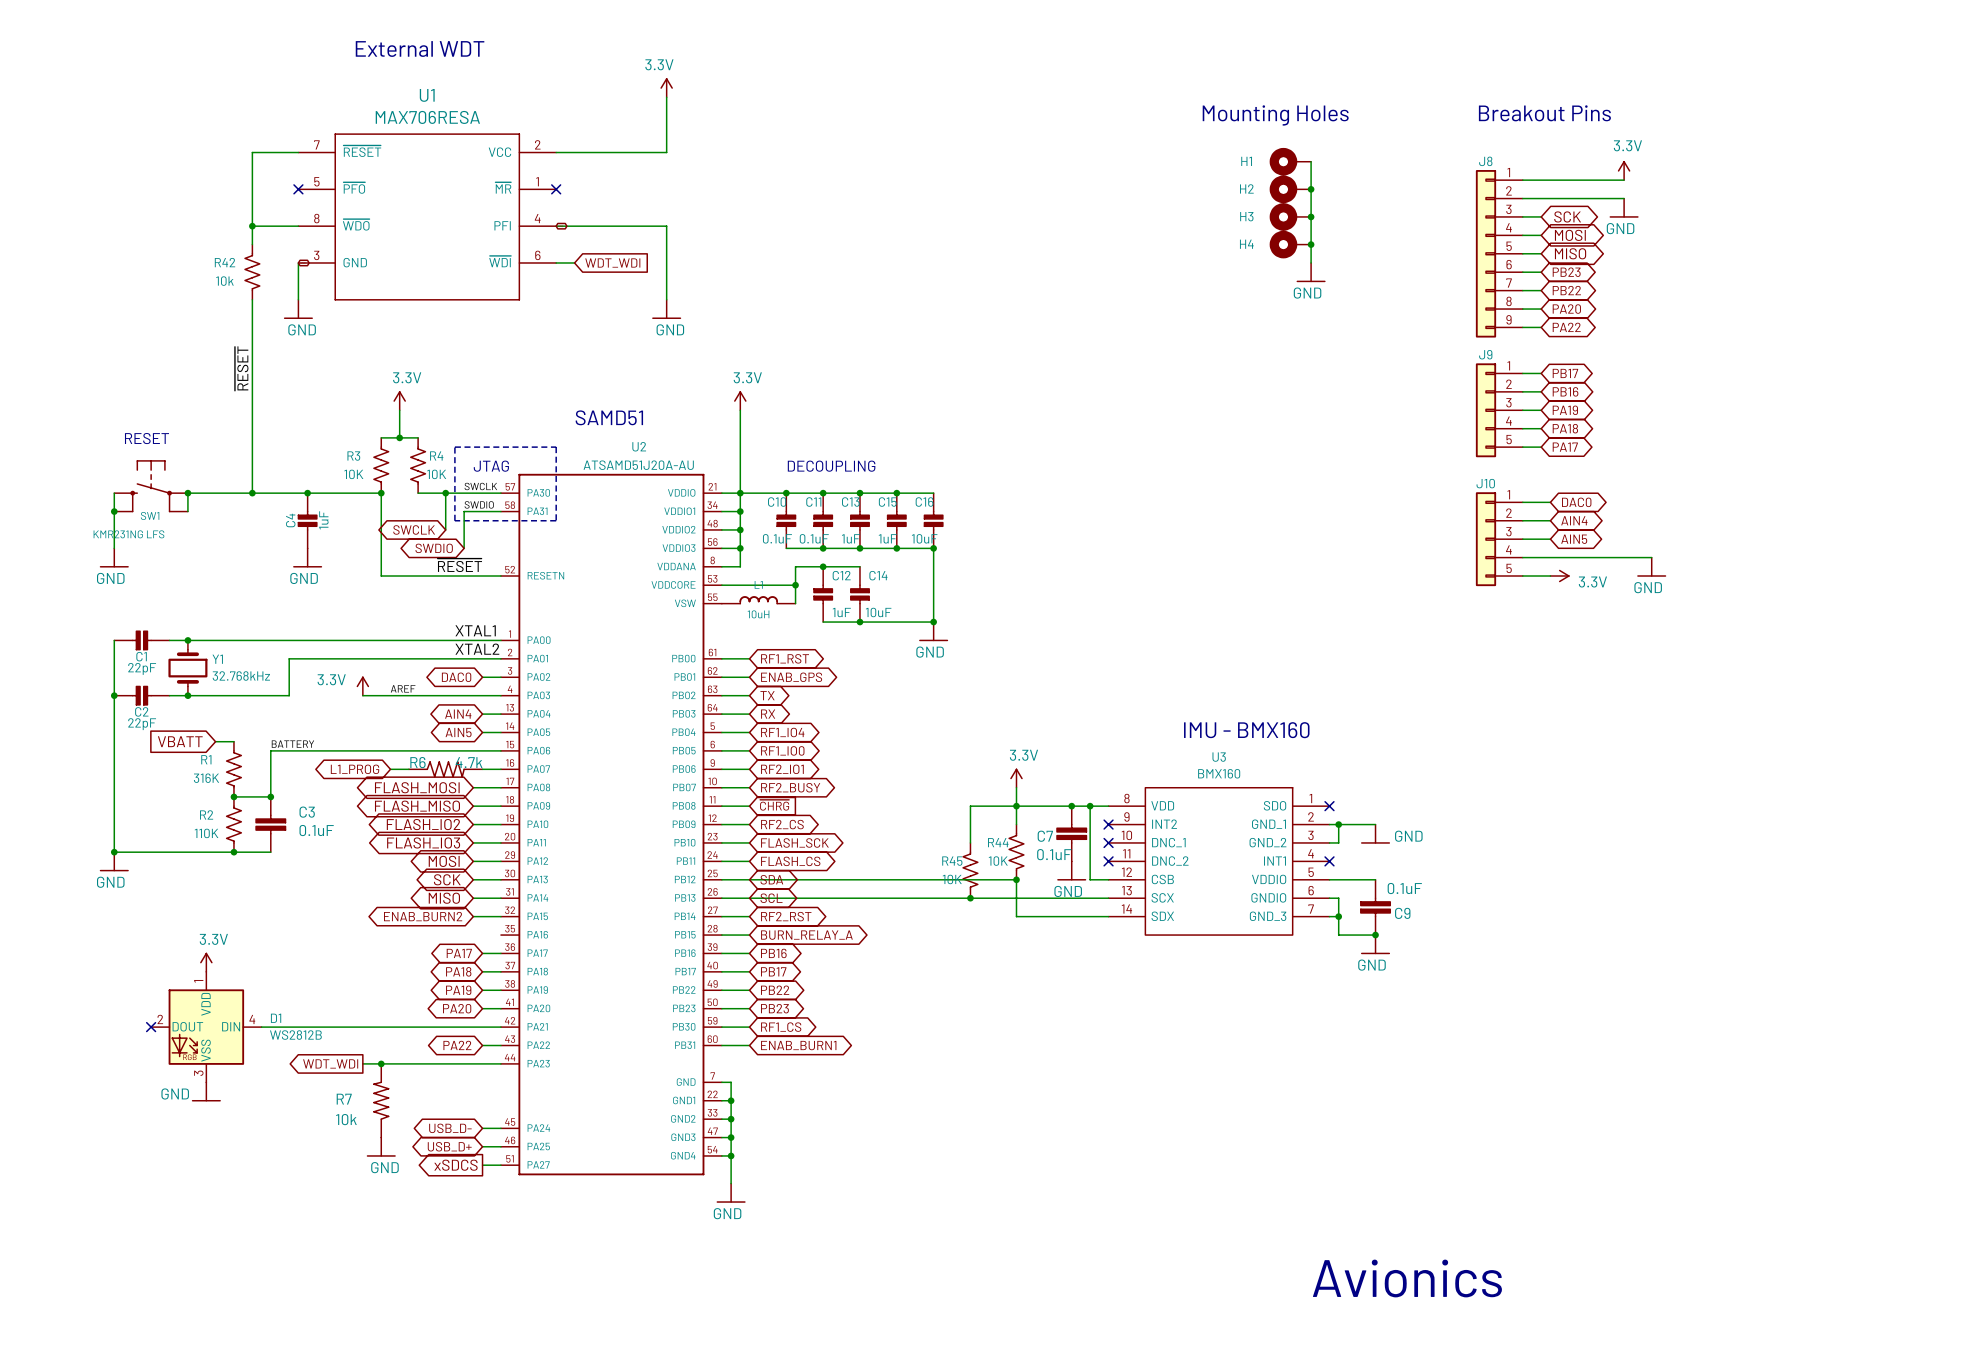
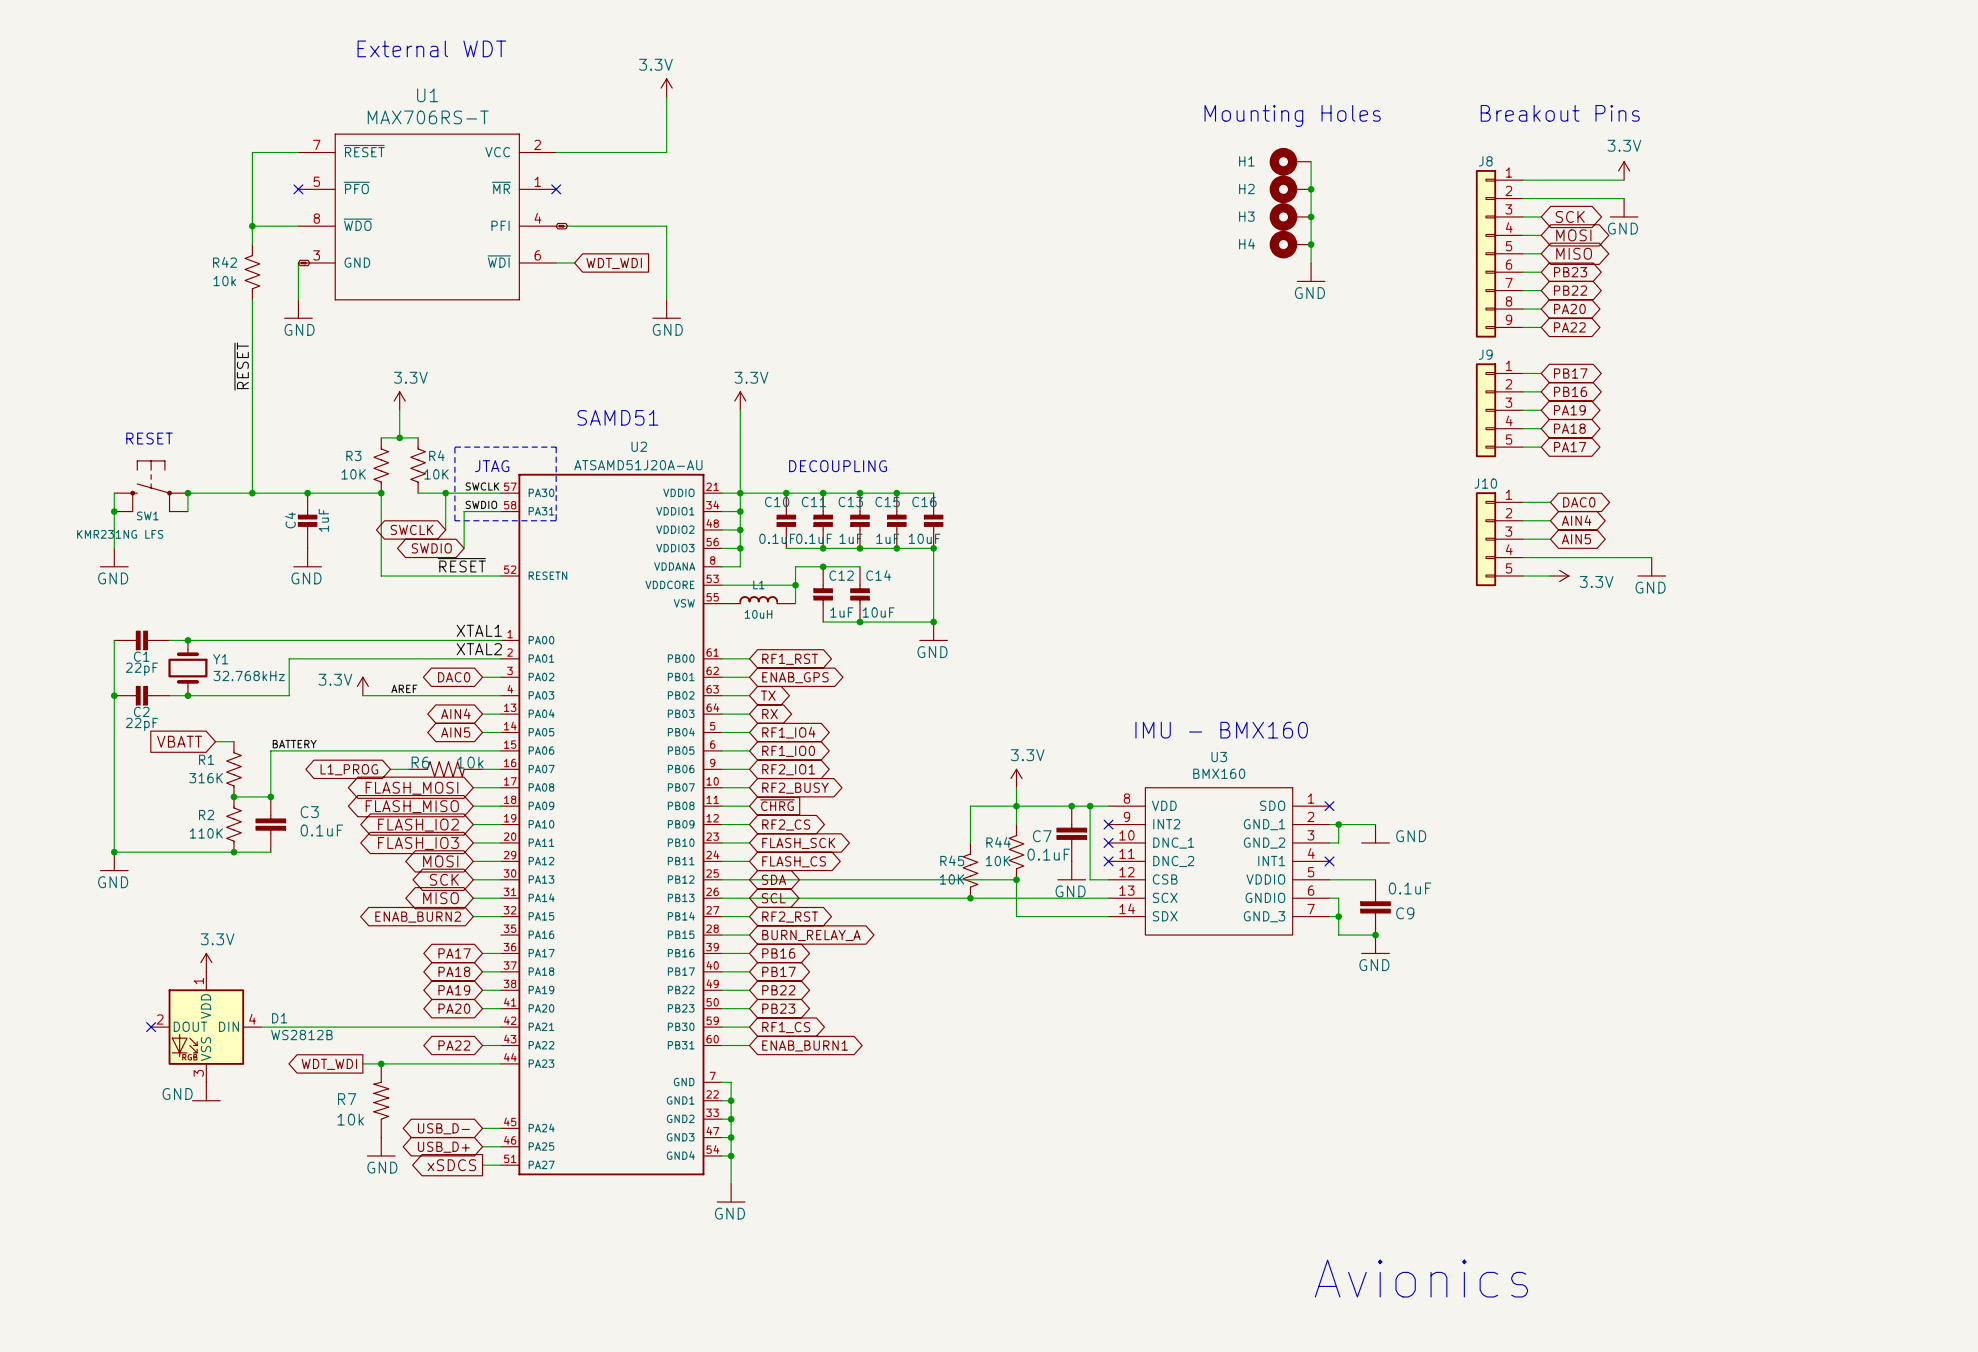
U1 value: MAX706RESA (427, 117) -> MAX706RS-T (428, 117)
R6 value: 4.7k (469, 762) -> 10k (470, 762)

